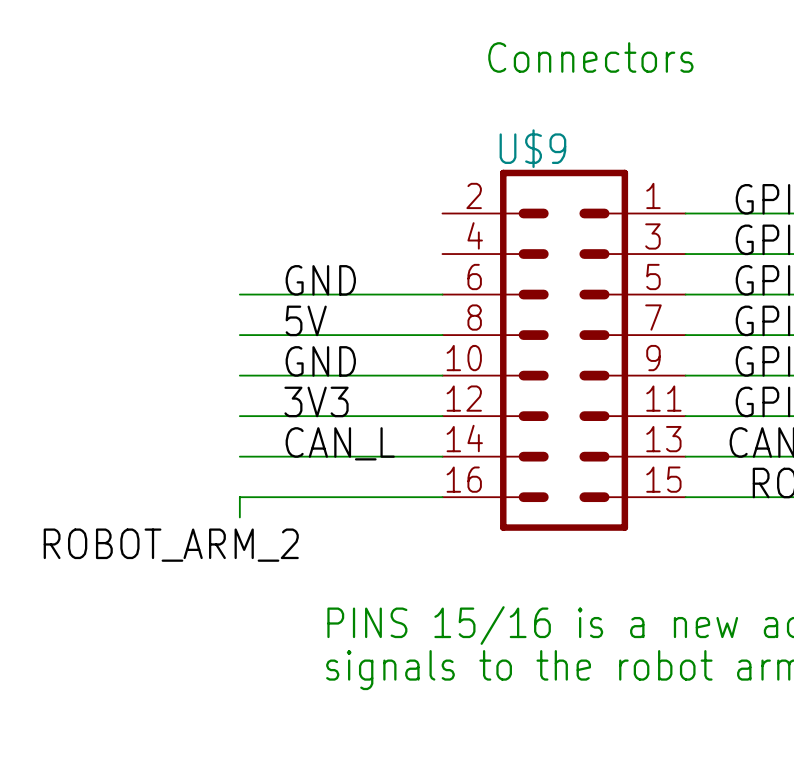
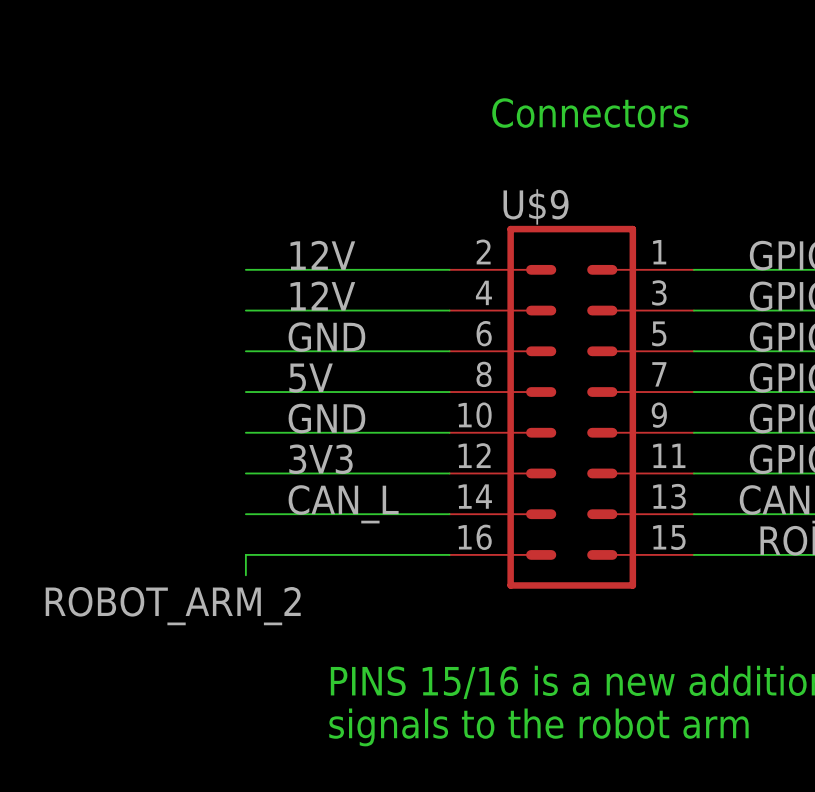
label: none -> 12V (322, 255)
wire: none -> (245, 269) (449, 269)
label: none -> 12V (322, 296)
wire: none -> (245, 310) (449, 310)

